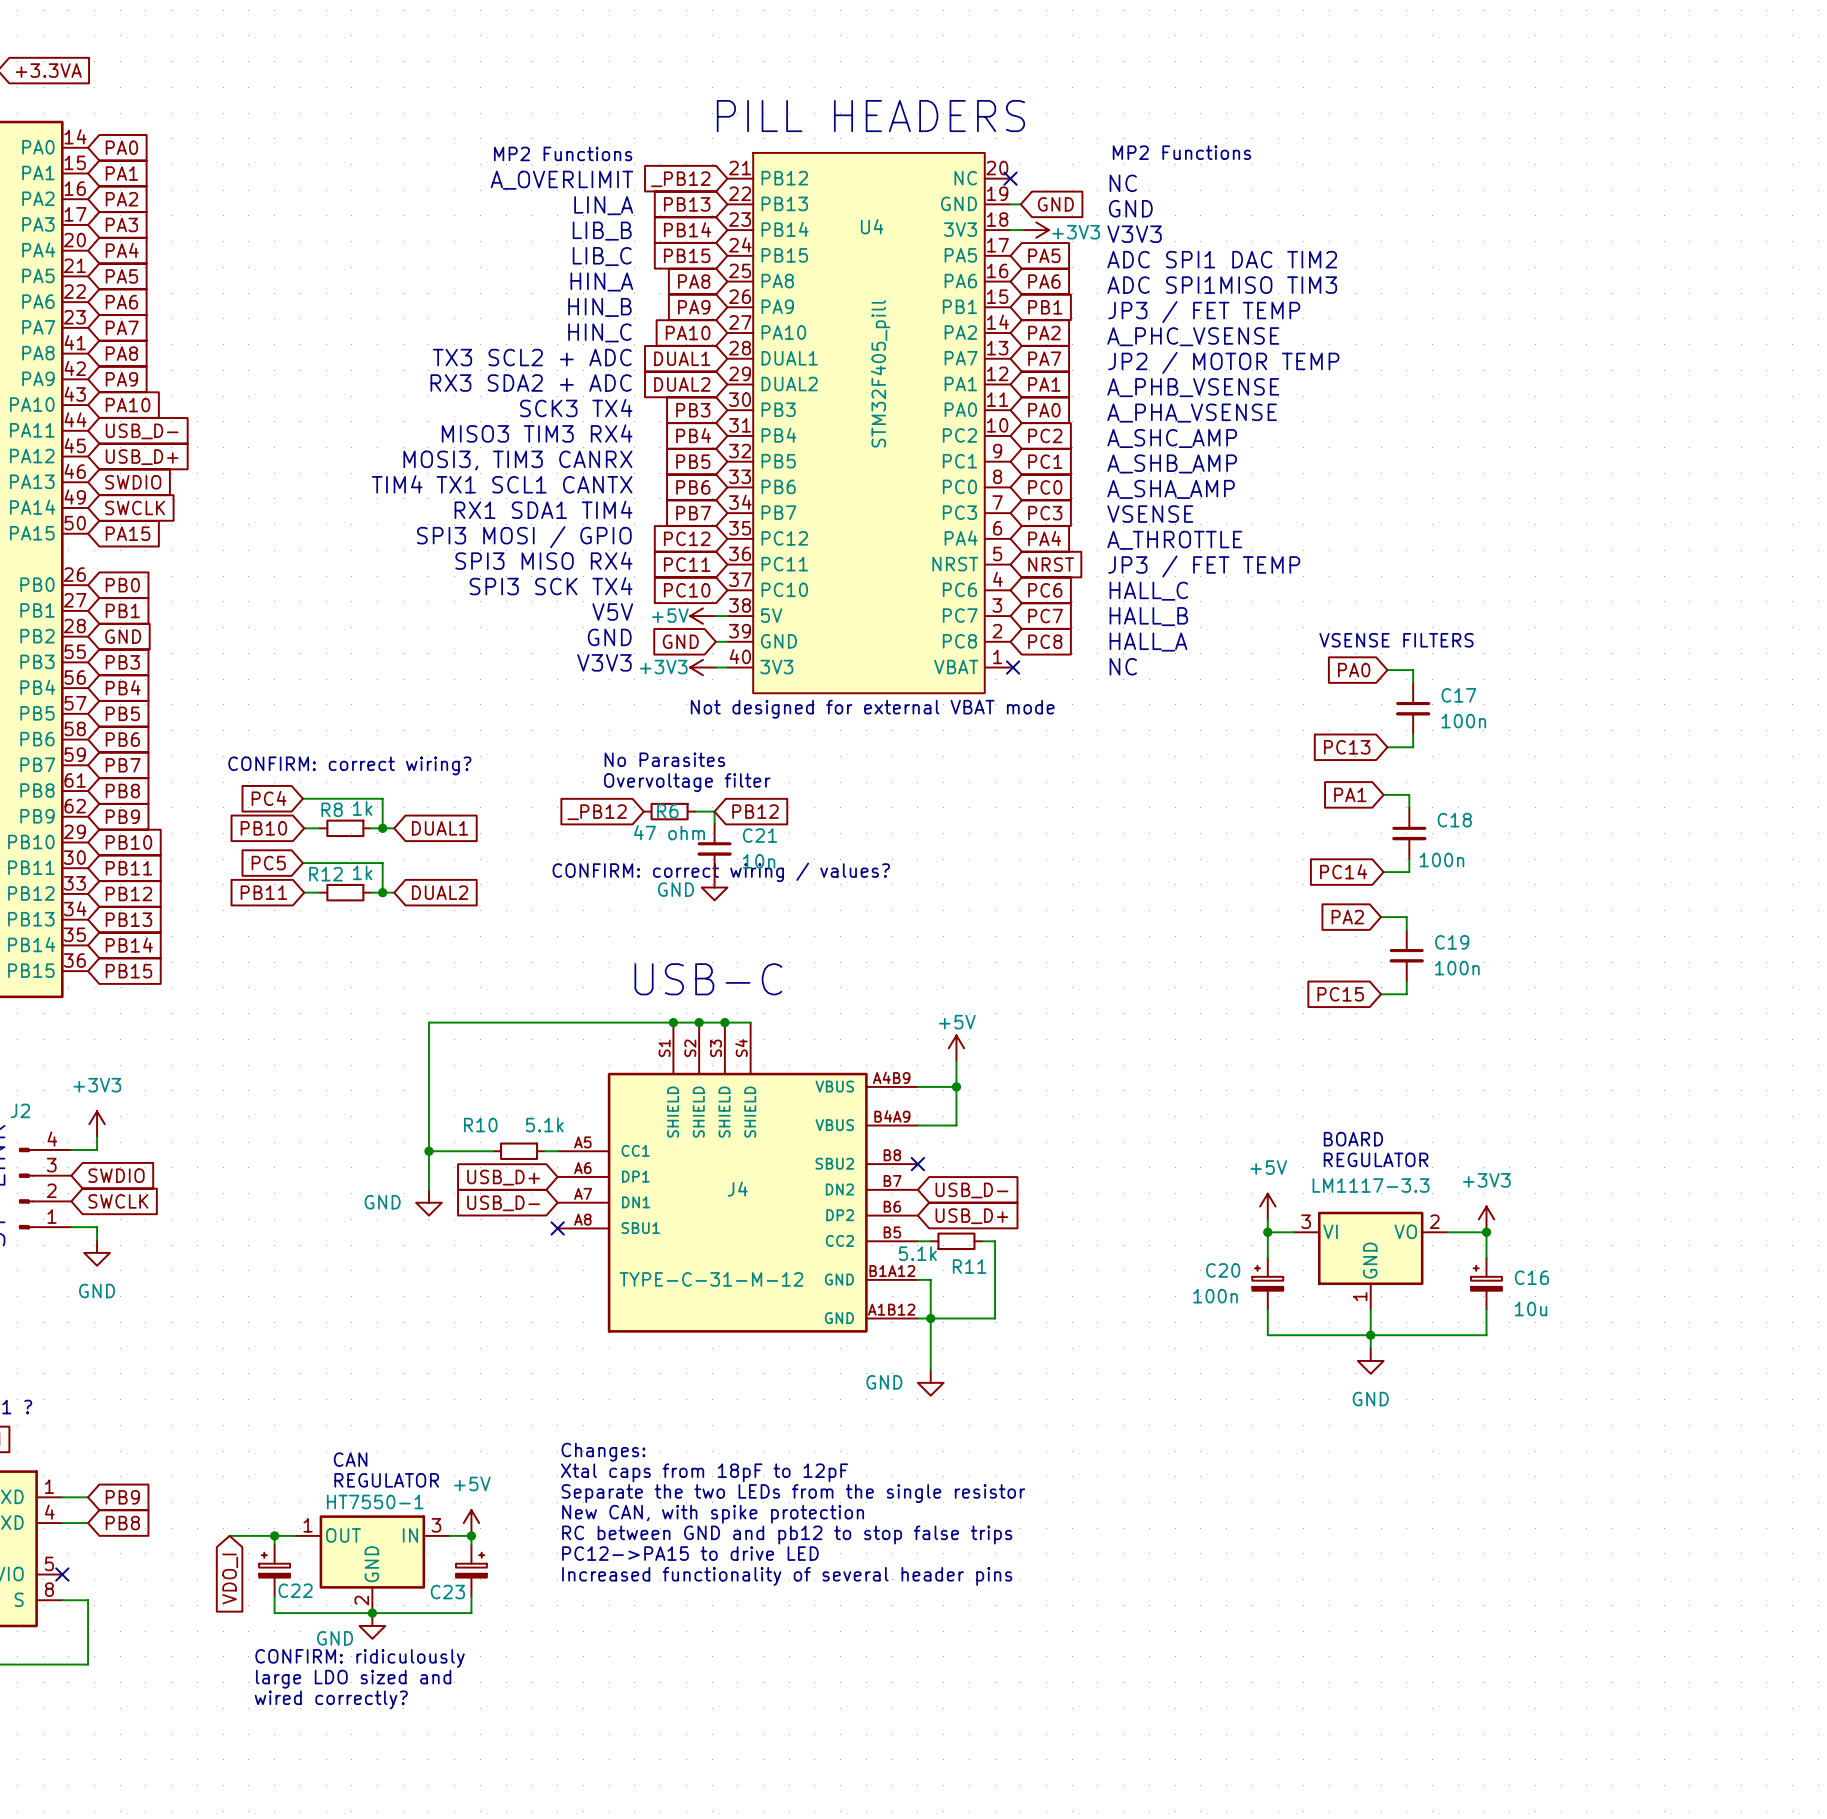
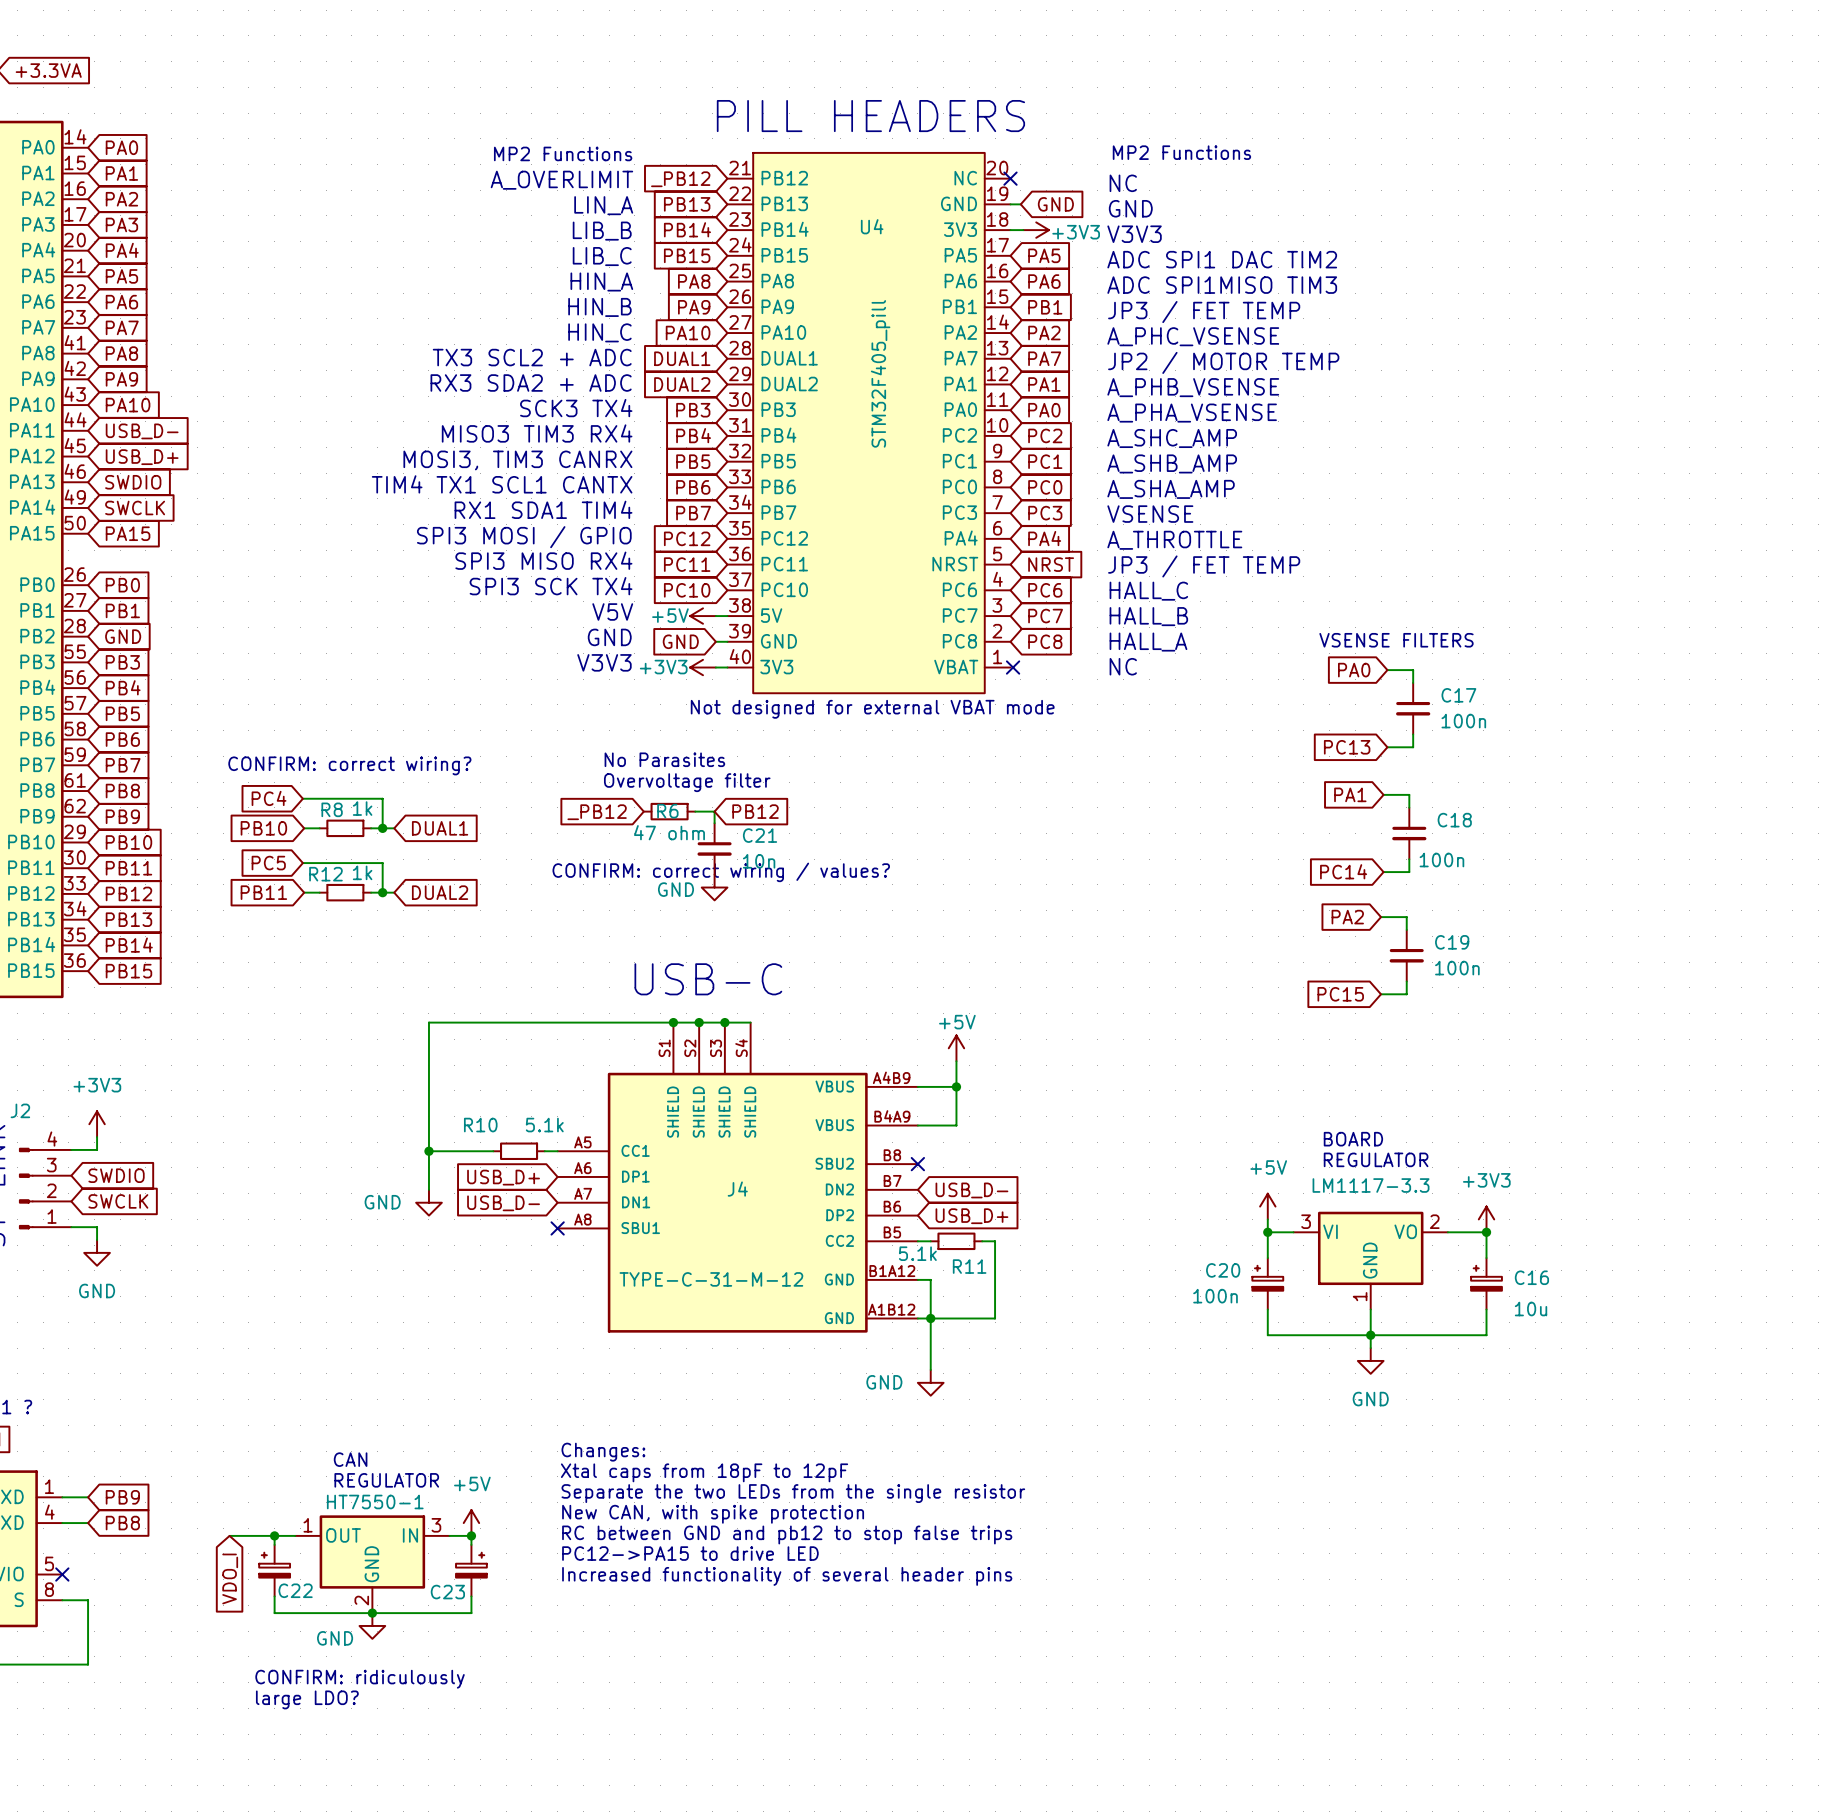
text: CONFIRM: ridiculously (360, 1658) -> none
text: large LDO sized and (353, 1679) -> CONFIRM: ridiculously (360, 1679)
text: wired correctly? (331, 1699) -> large LDO? (307, 1699)

